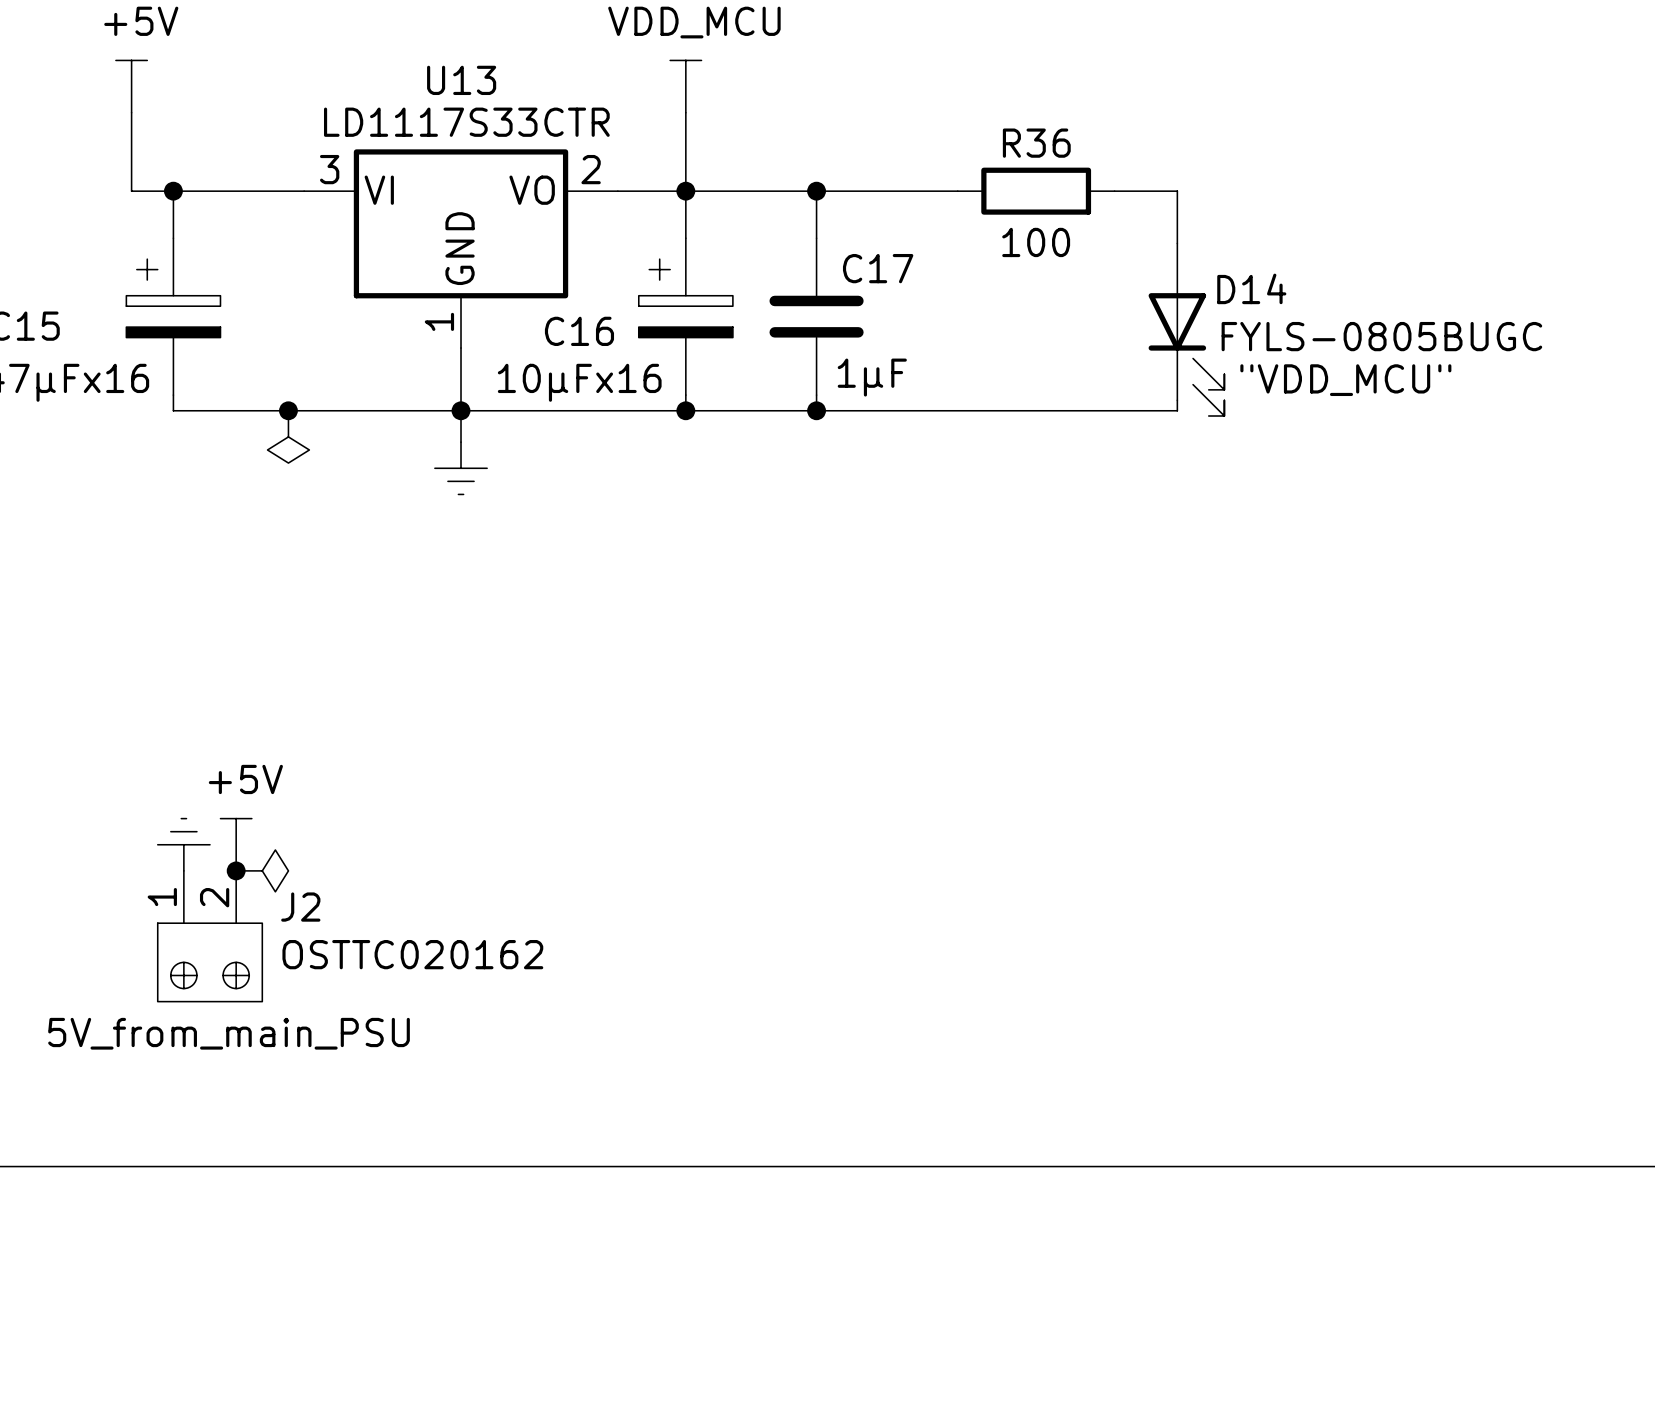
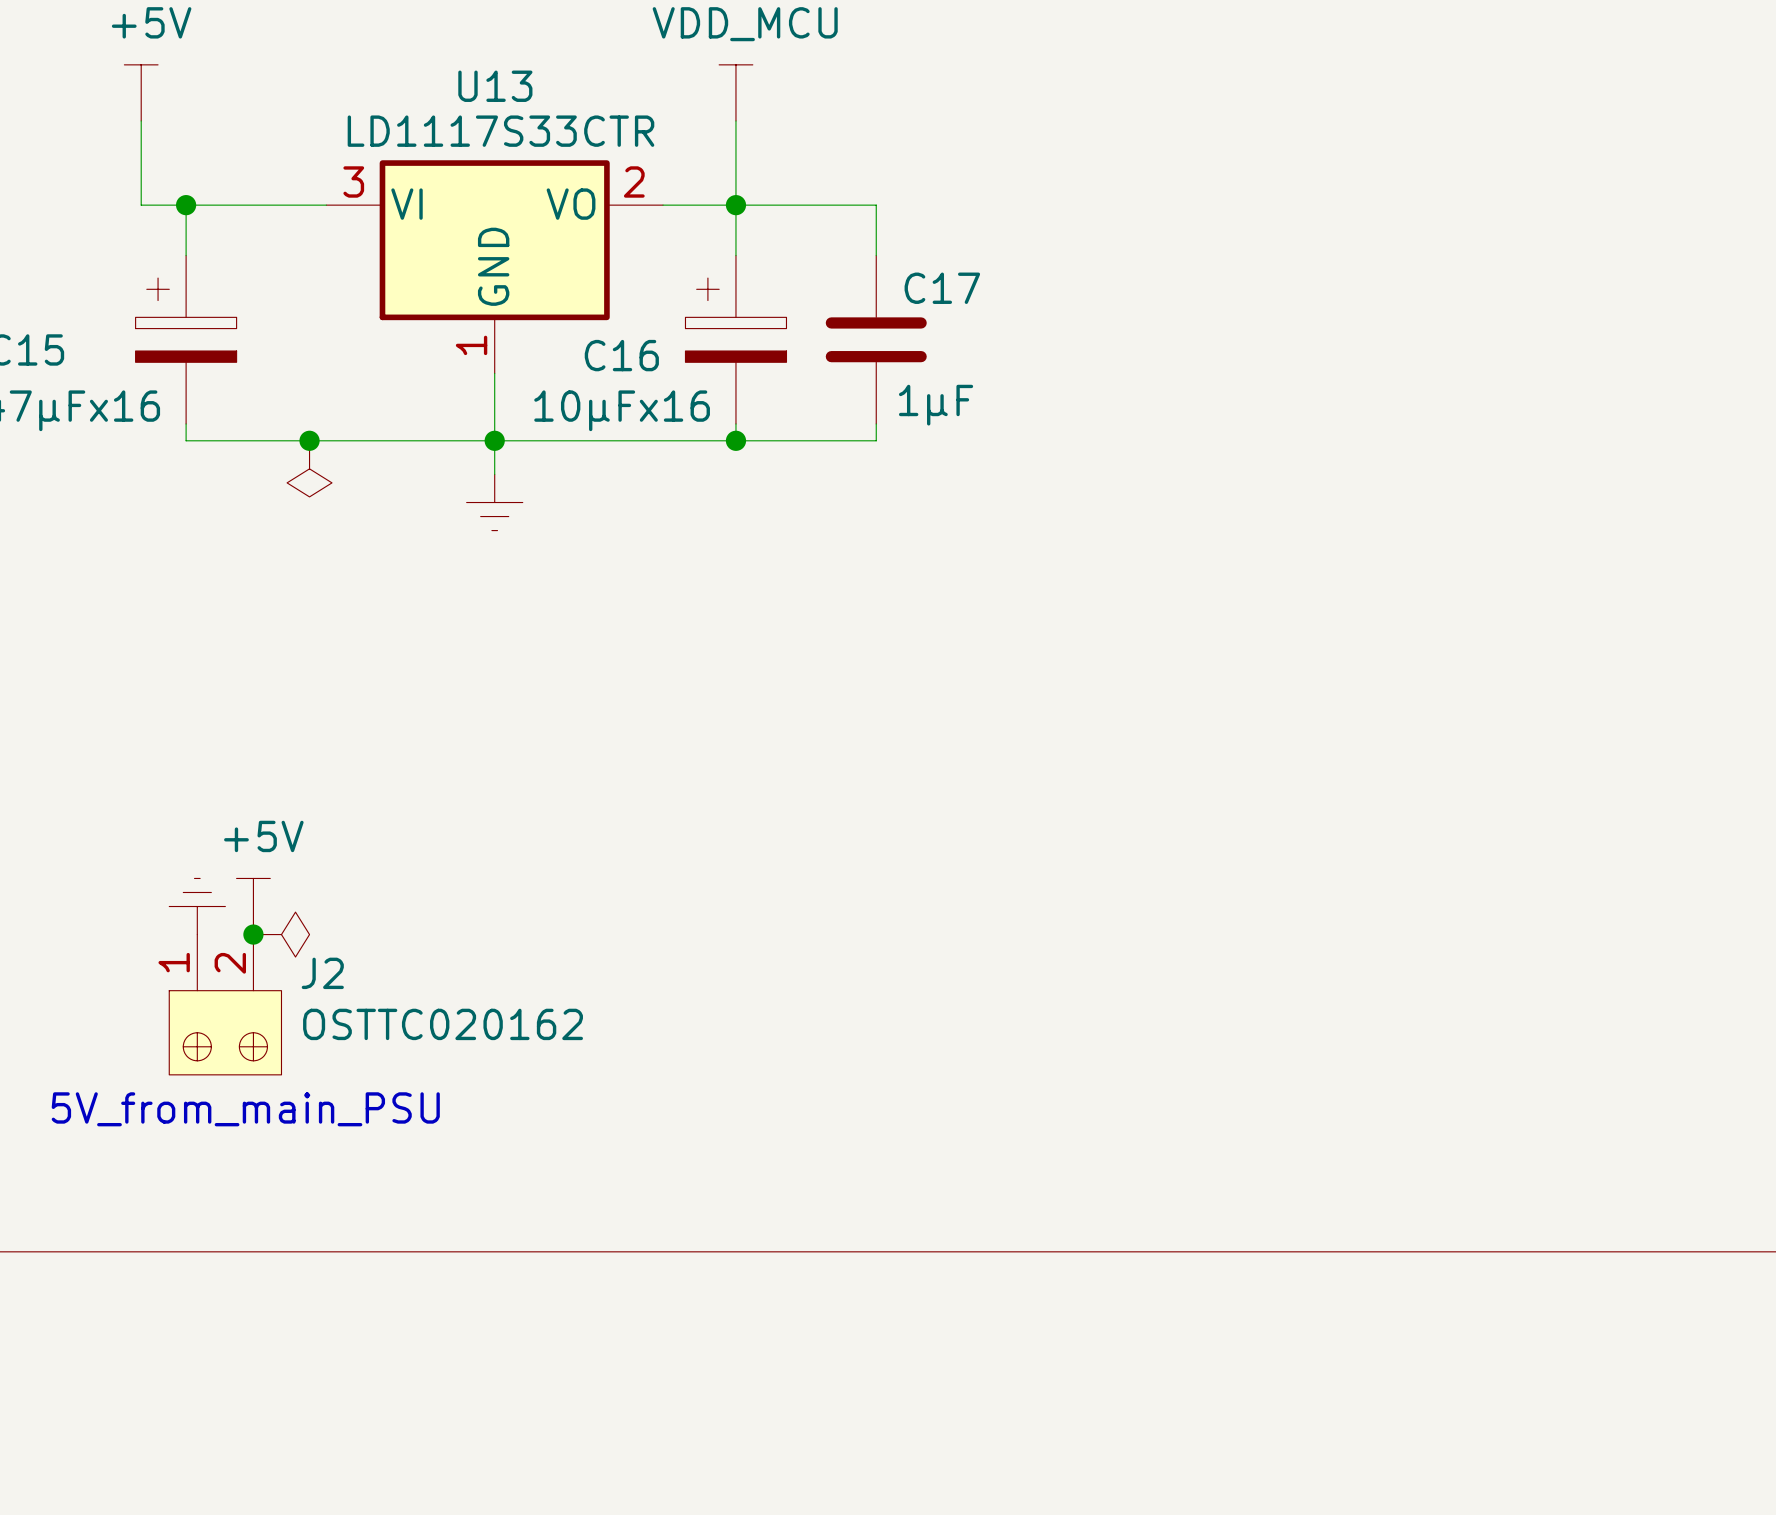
wire: (816, 191) (957, 191) -> none
junction: (816, 191) -> none
R36: 100 (1036, 191) -> none
wire: (1114, 191) (1177, 191) (1177, 243) -> none
D14: FYLS-0805BUGC (1186, 329) -> none
text: "VDD_MCU" (1345, 380) -> none
wire: (1177, 400) (1177, 410) (816, 410) -> none
junction: (816, 410) -> none

